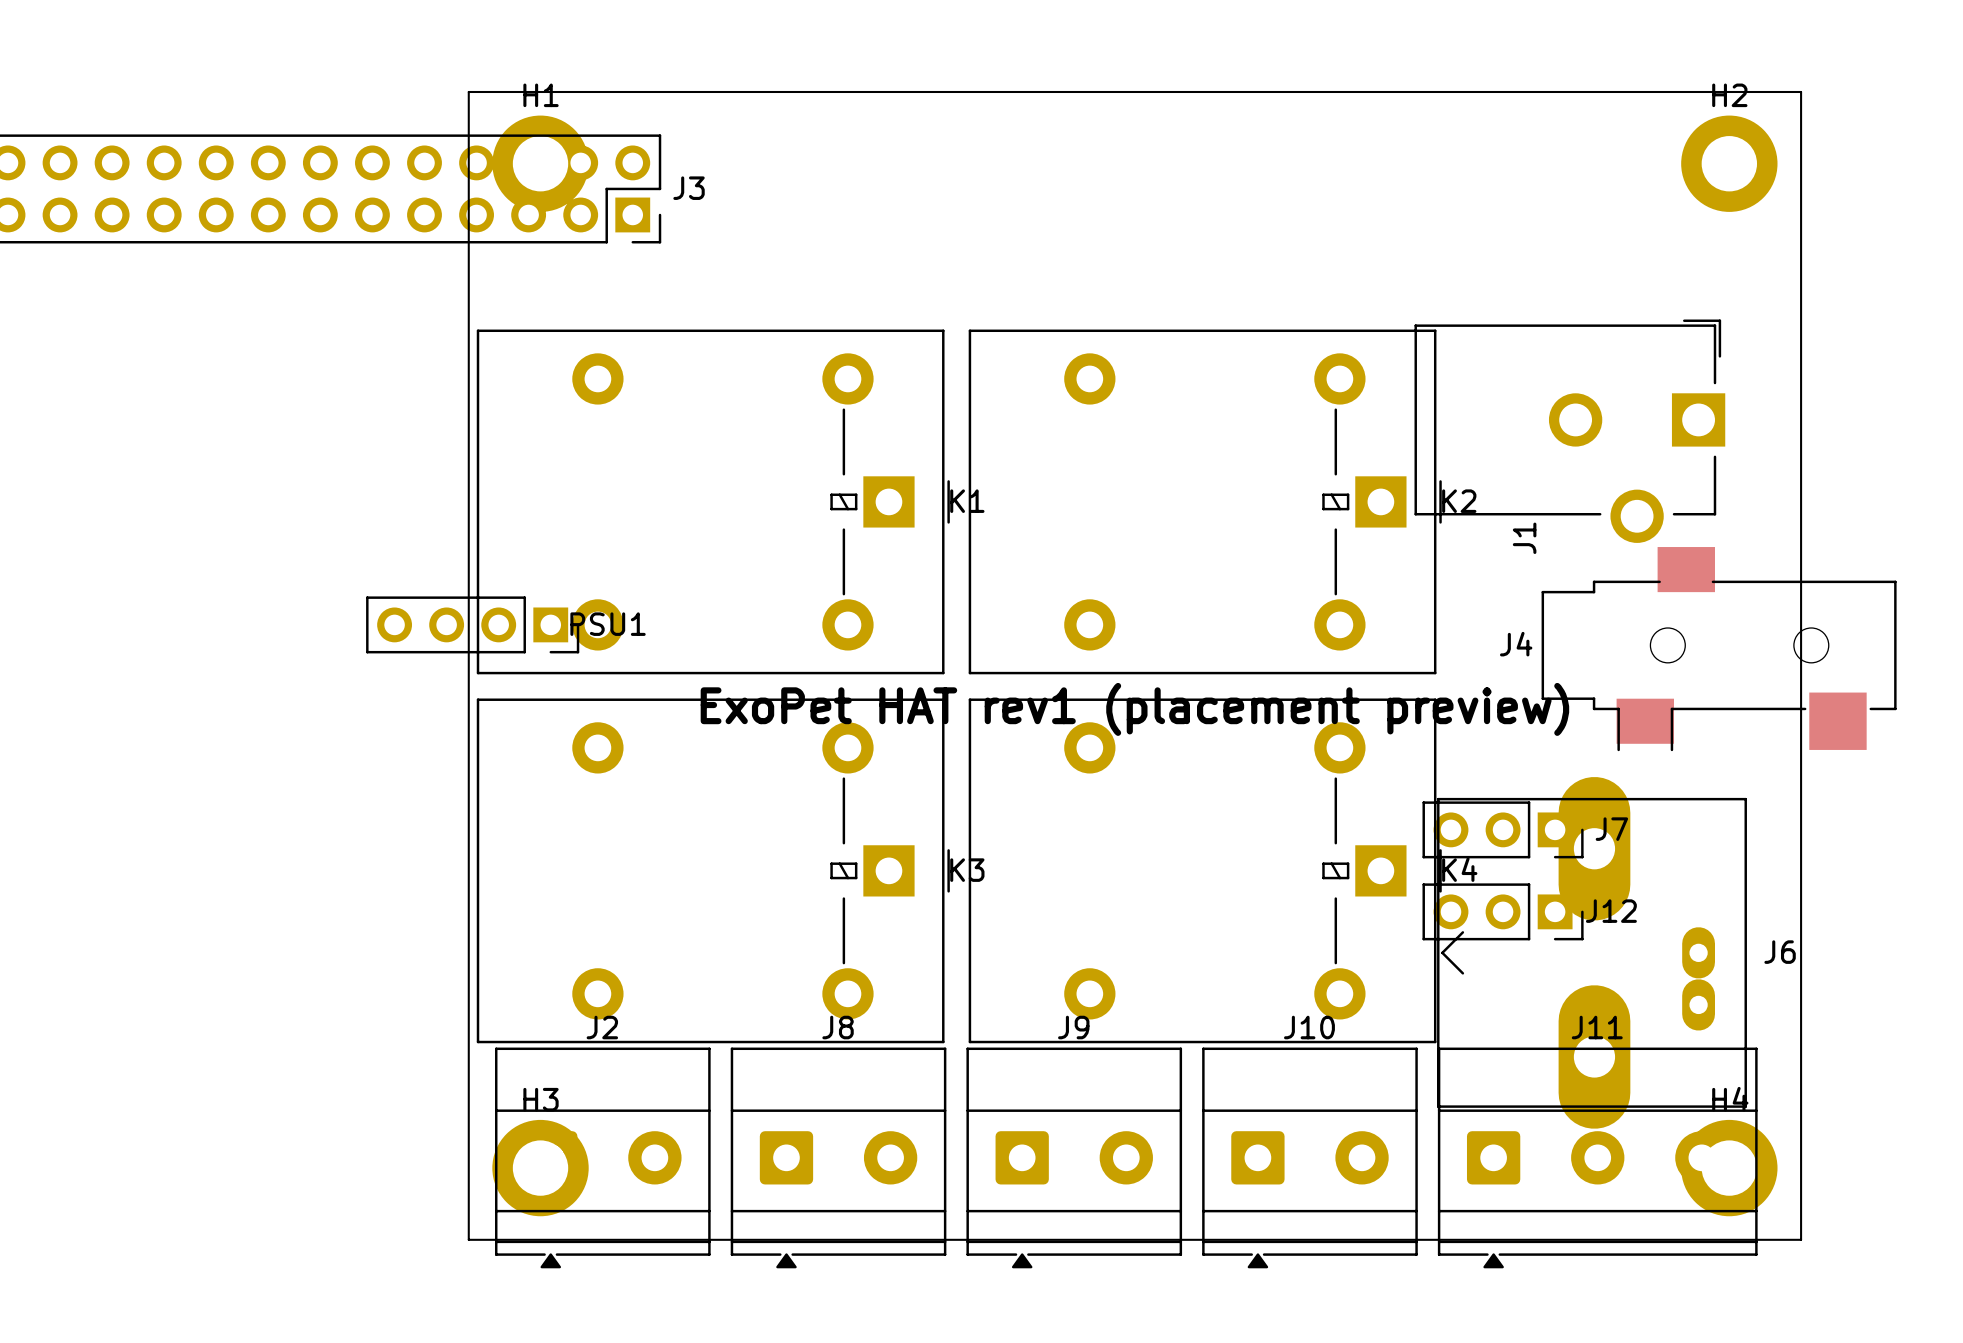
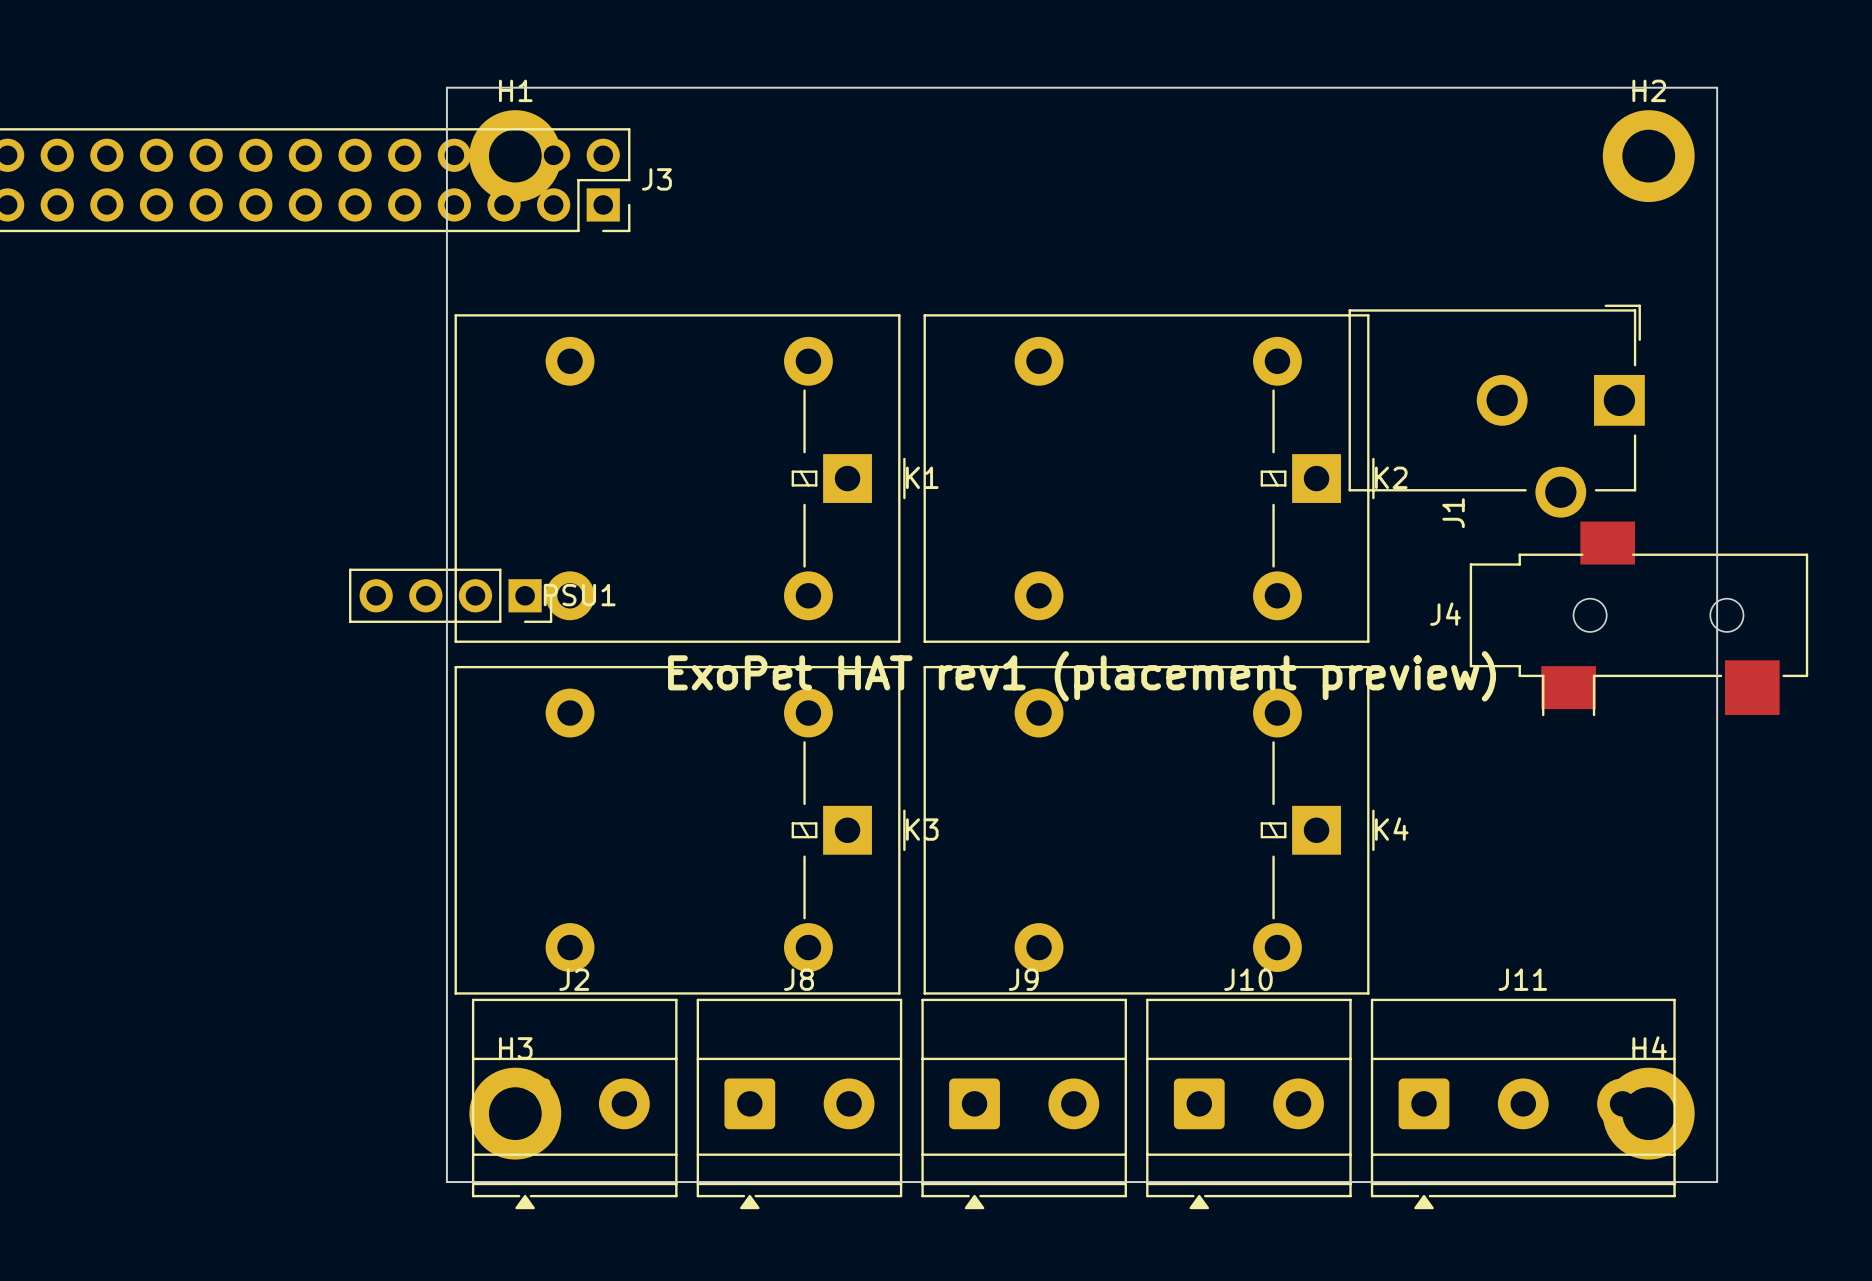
J7: (1503, 829) -> none
J12: (1503, 911) -> none
J6: (1592, 952) -> none

